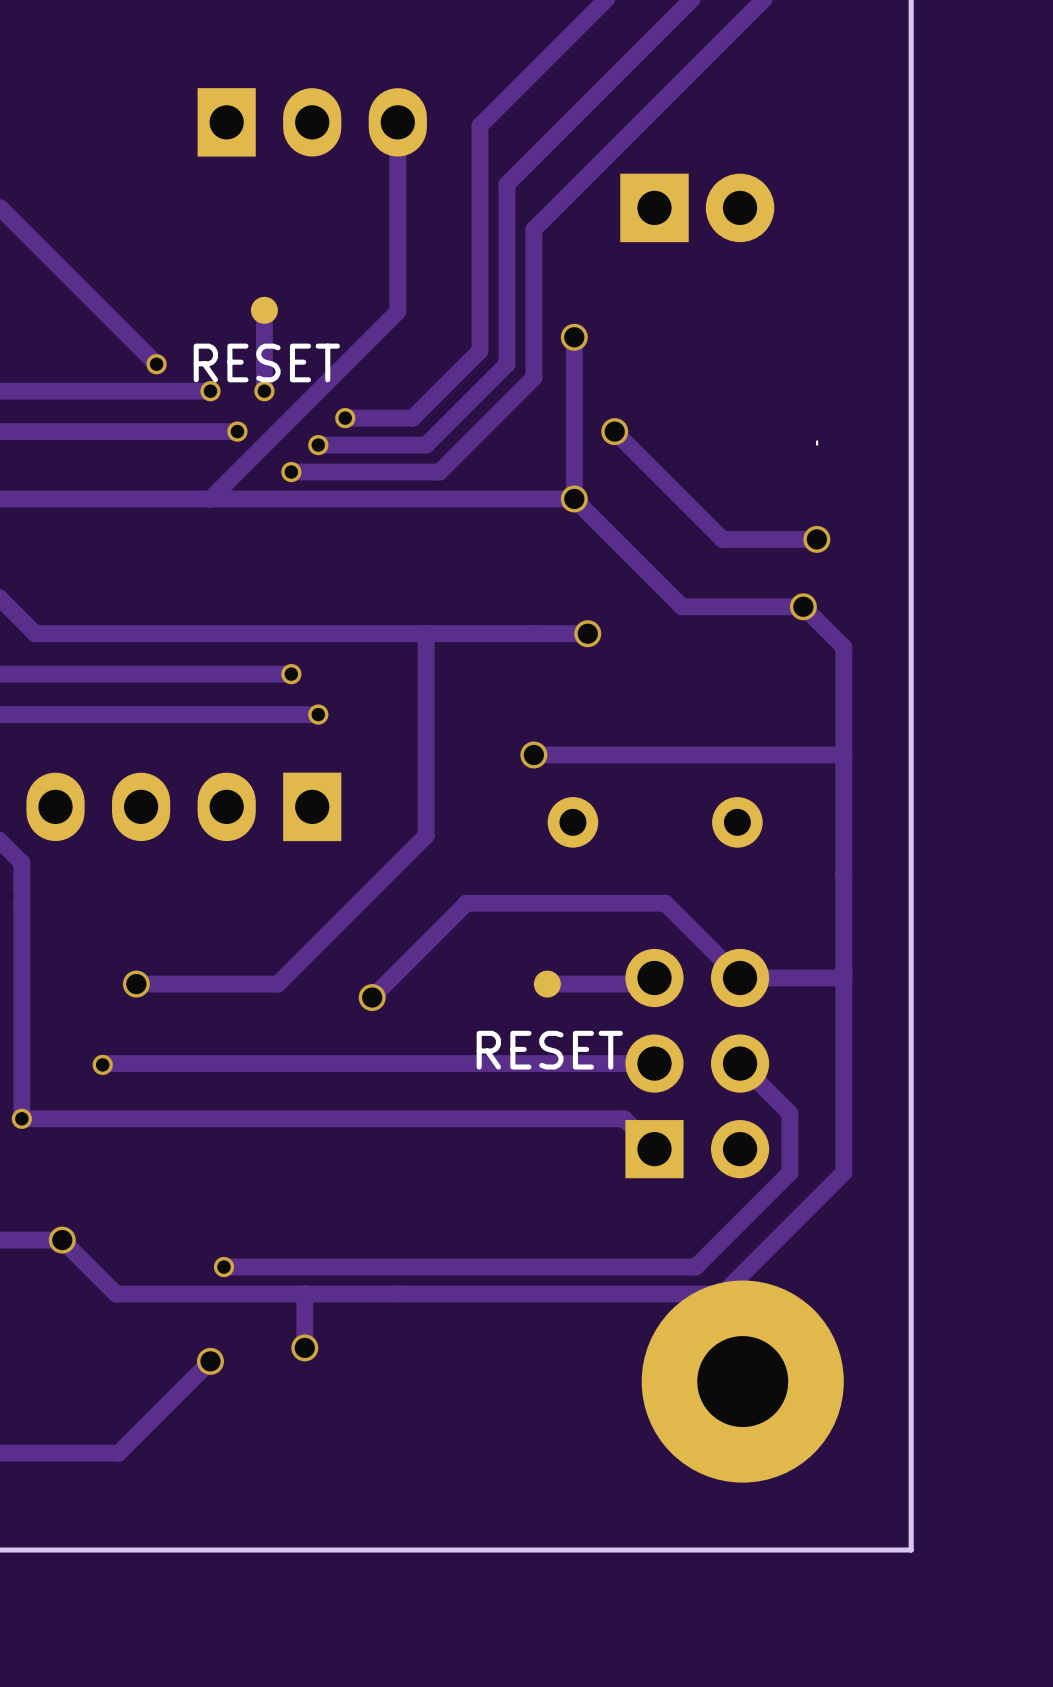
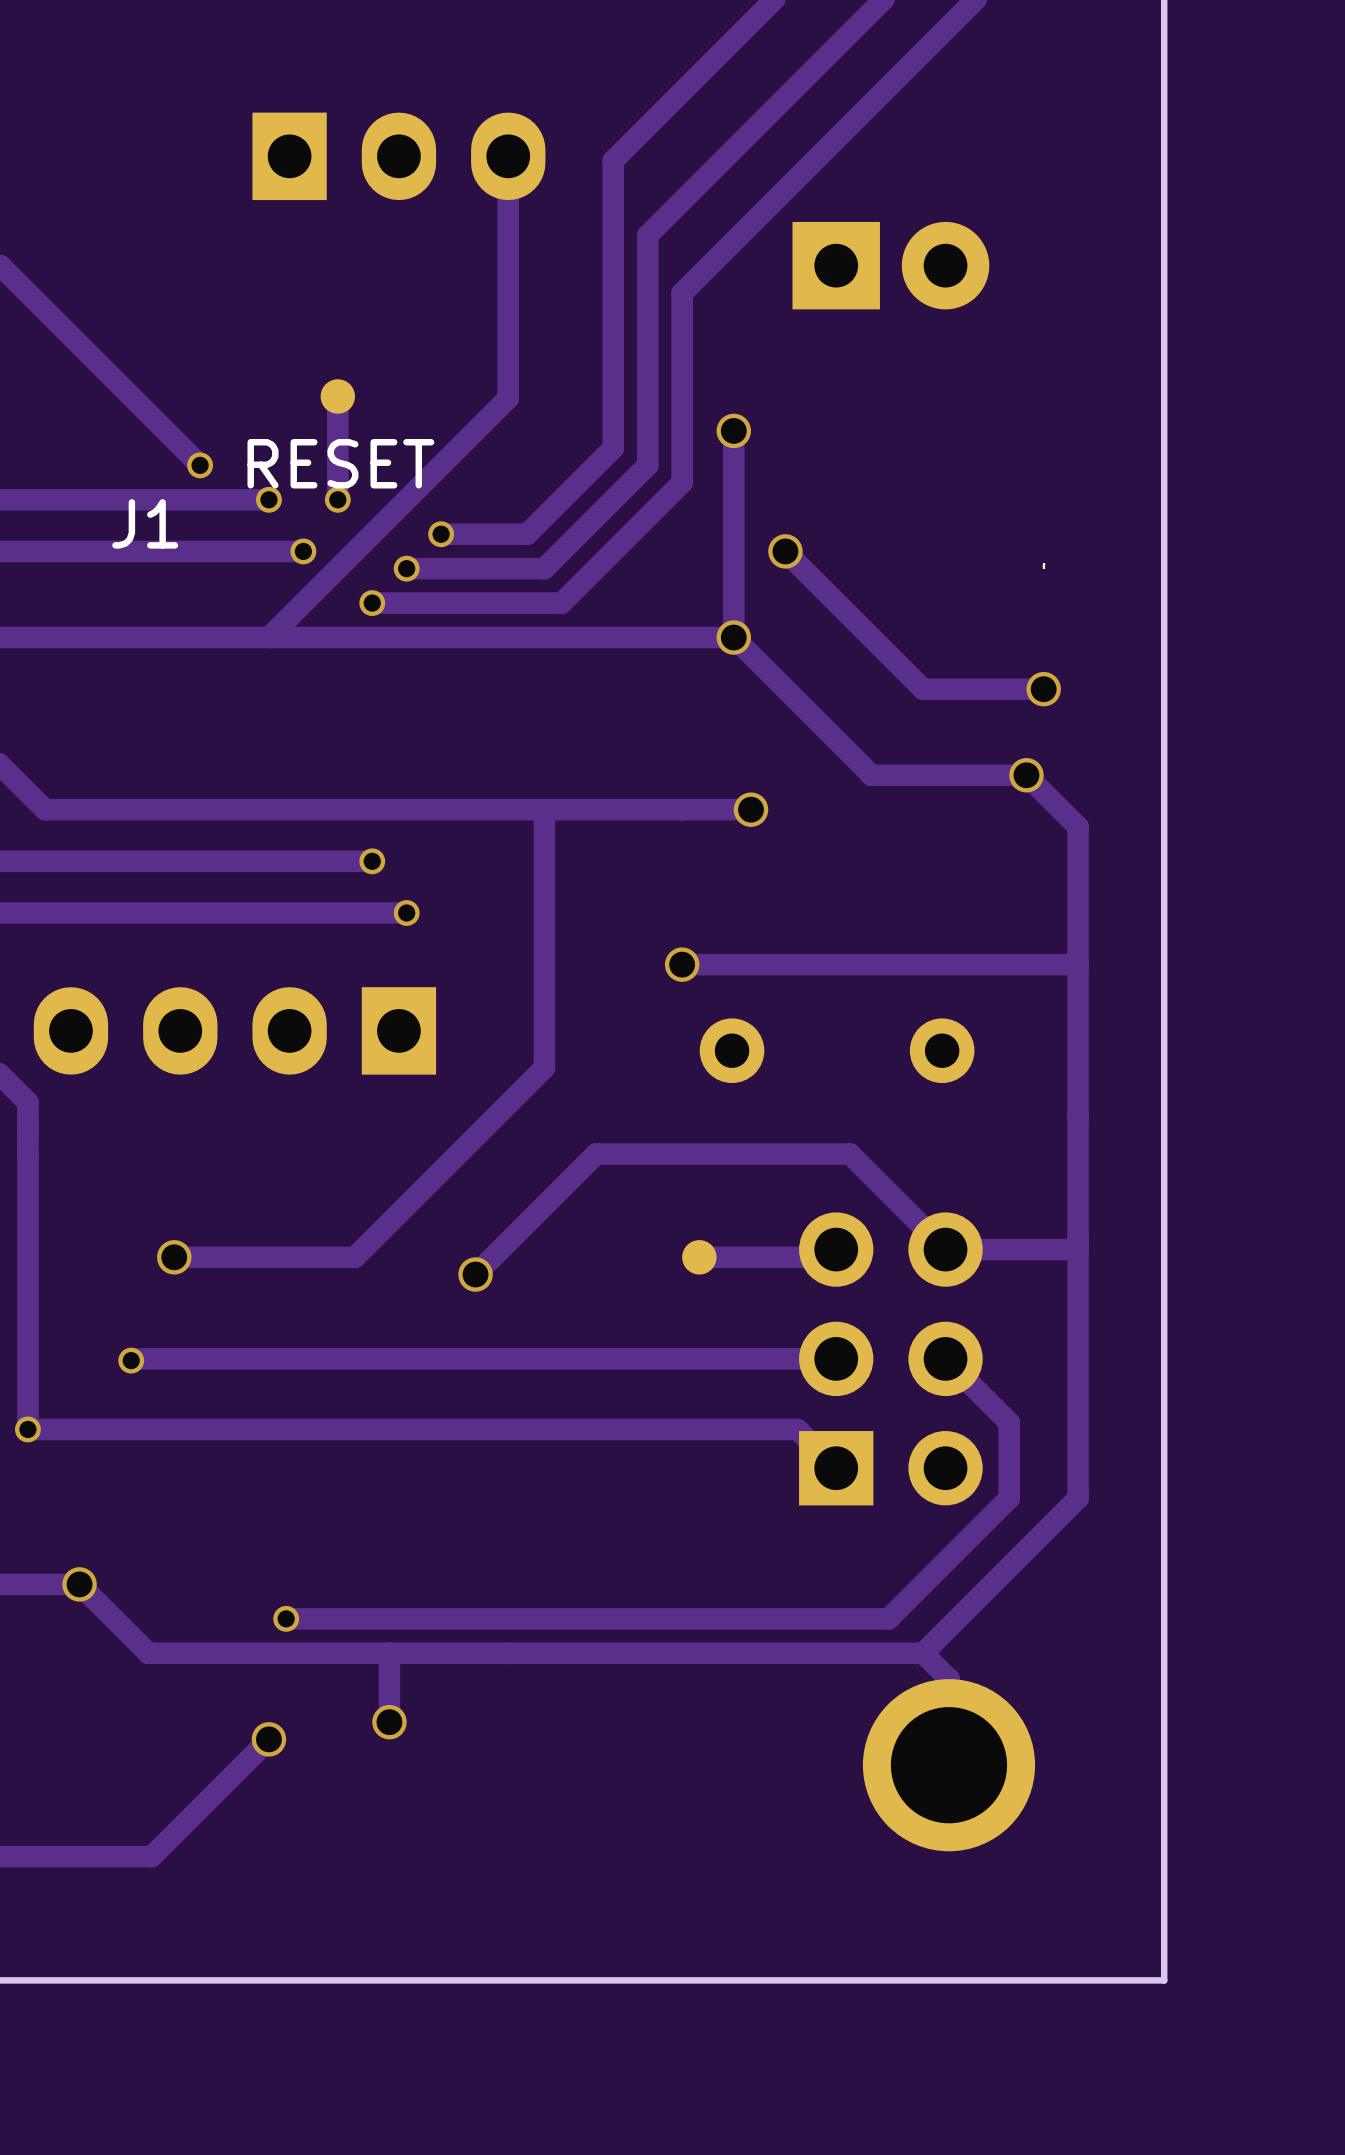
J1 name: none -> J1 (145, 523)
text: RESET (549, 1050) -> none
part footprint: [641, 1280, 844, 1483] -> [862, 1679, 1036, 1852]

